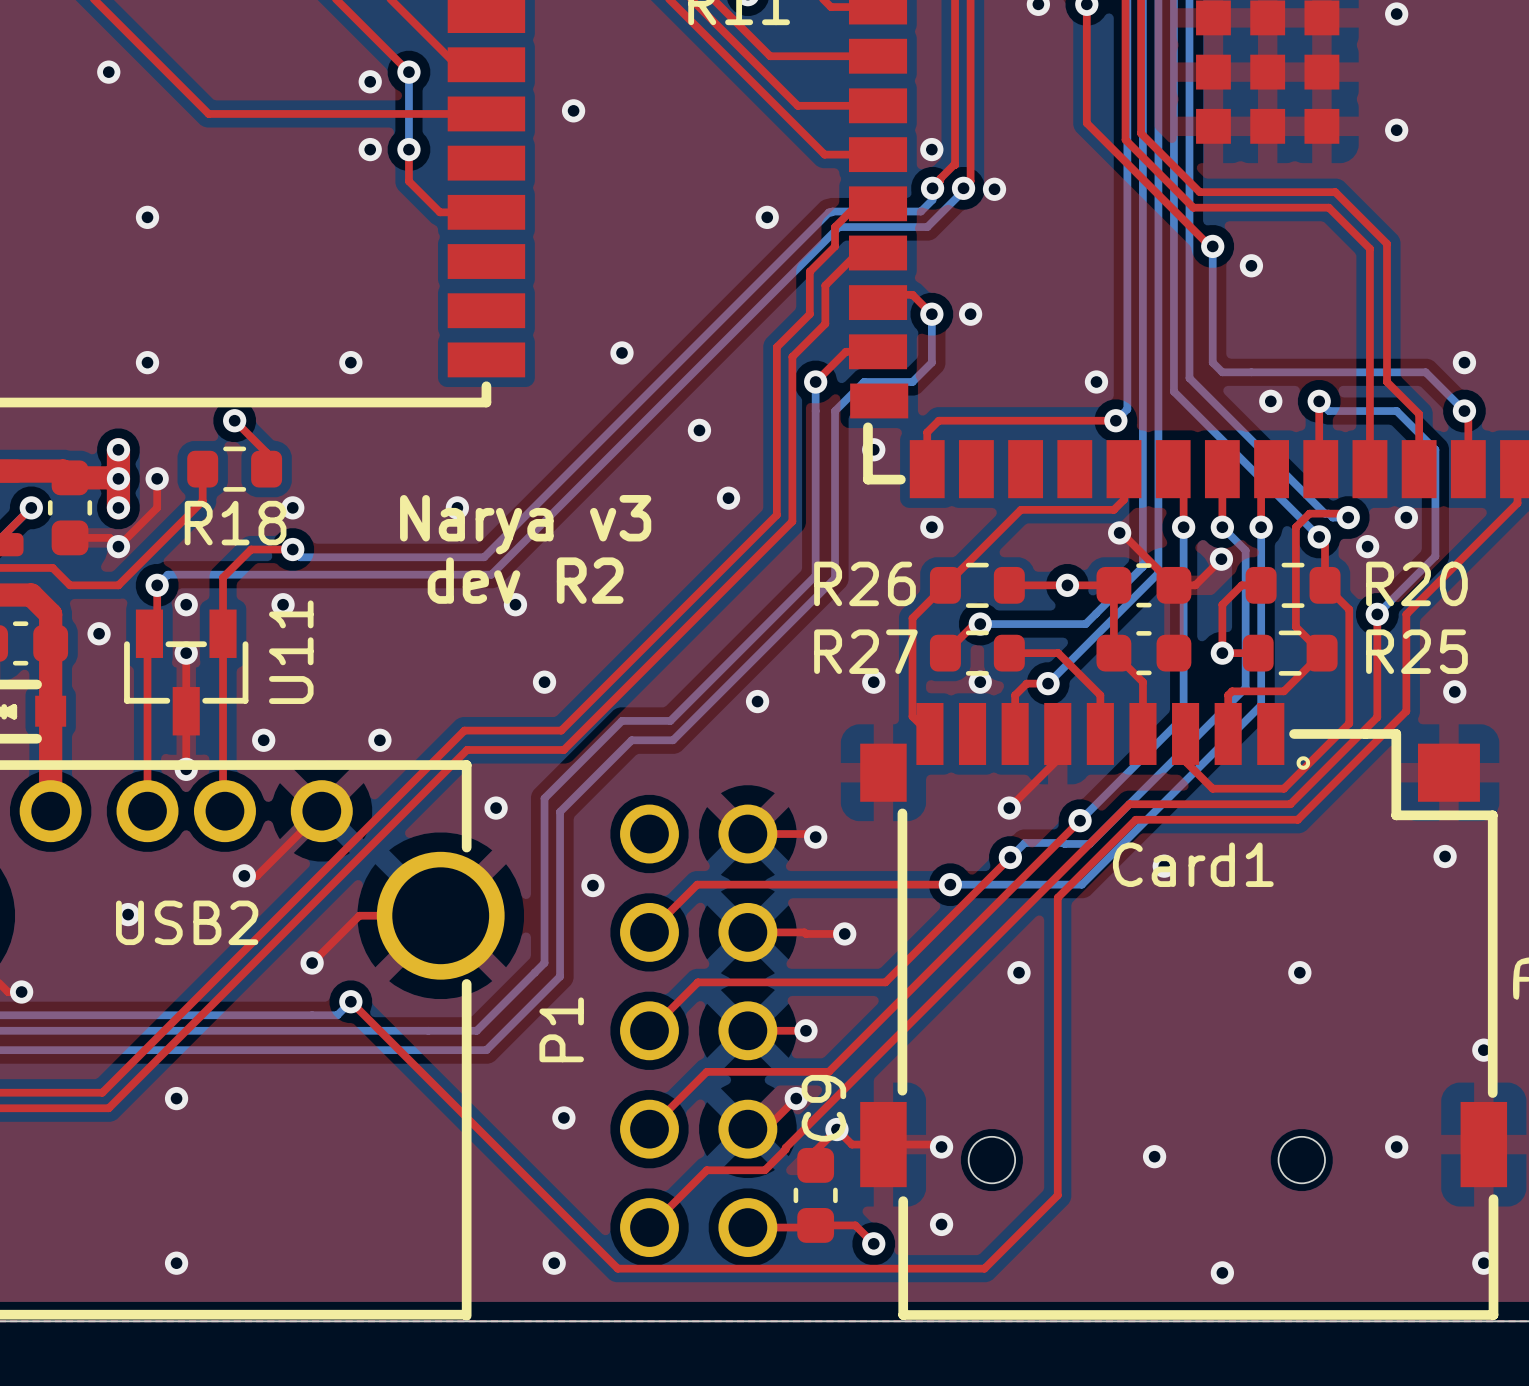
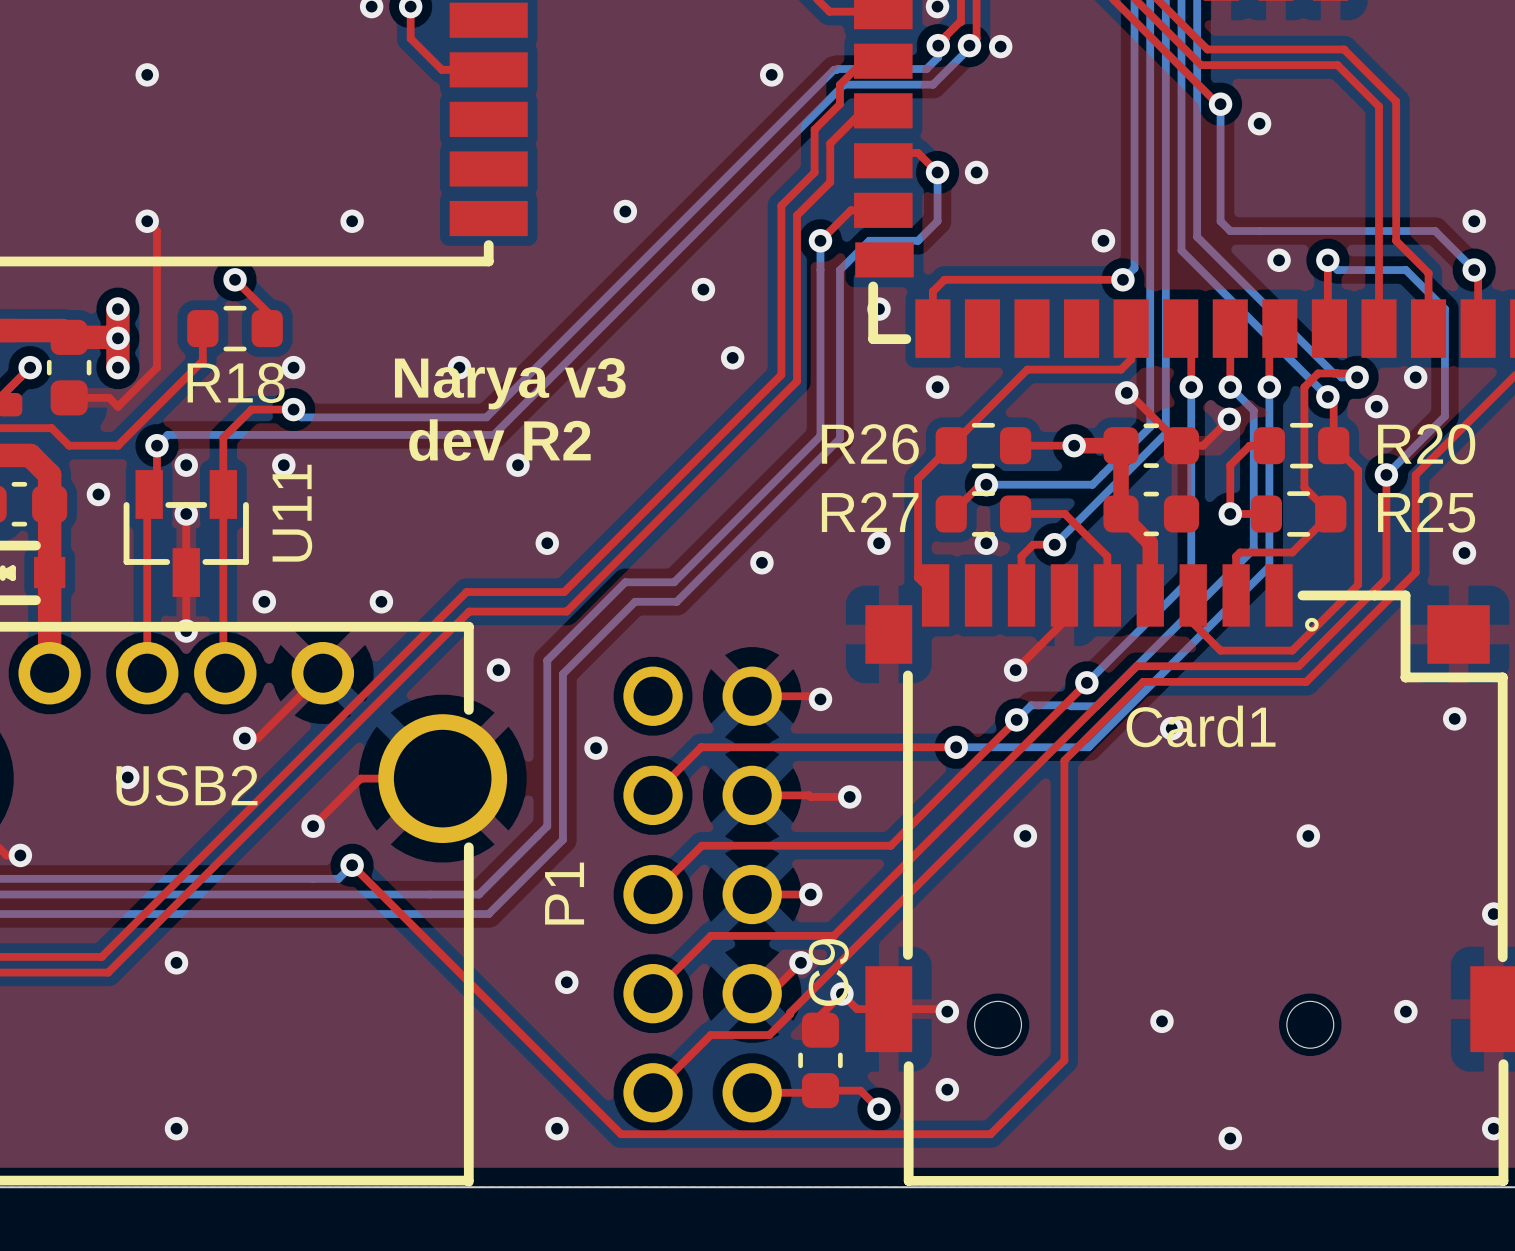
top track: none -> (147, 221) (156, 231) (156, 338)
via: (157, 478) -> none
via: (118, 546) -> none
top track width: thin (1067, 585) (1113, 585) (1113, 653) (1142, 682) (1142, 733) -> thick (1074, 445) (1121, 445) (1121, 513) (1150, 543) (1150, 595)

